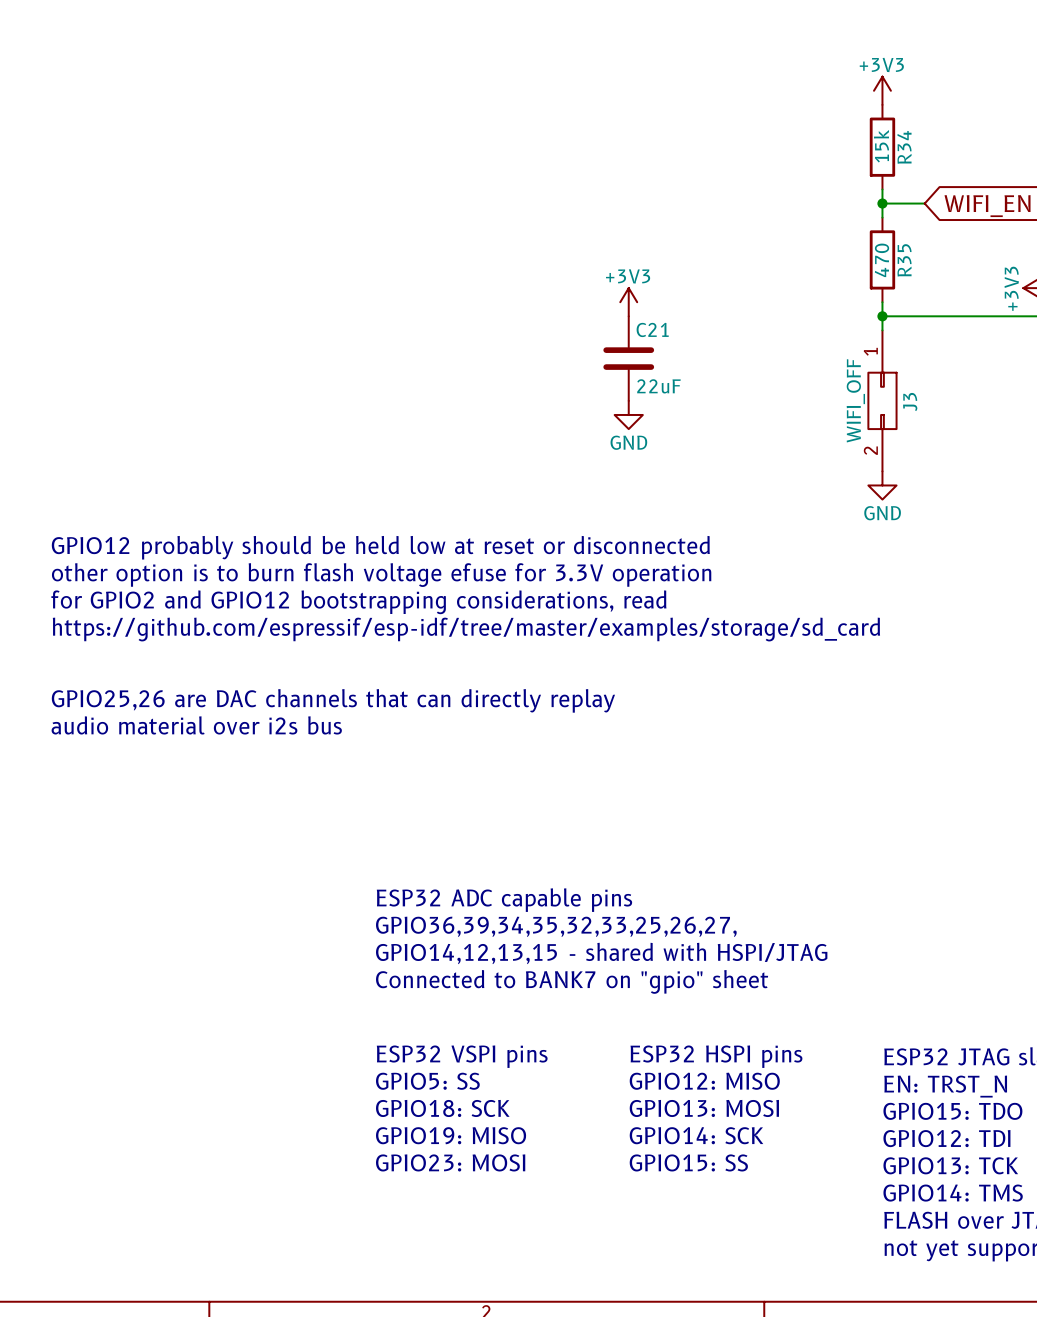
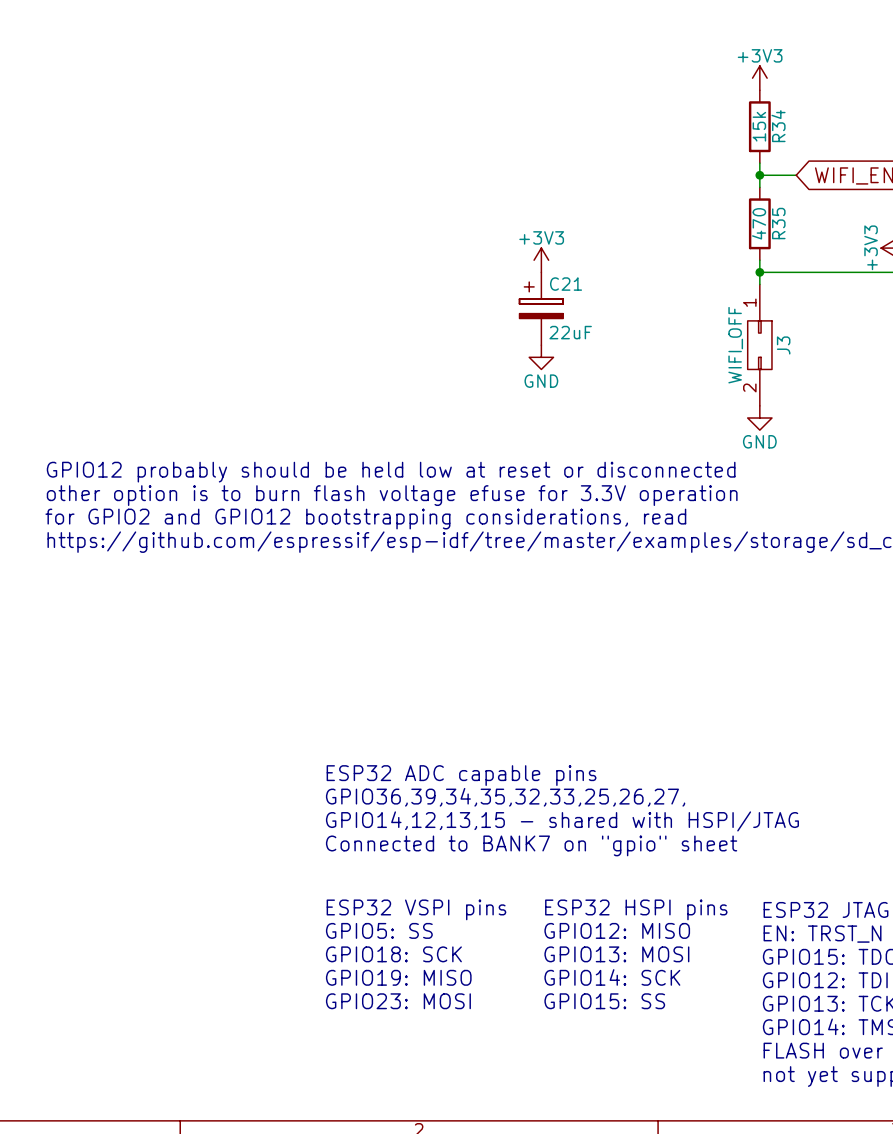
C21 symbol: [603, 316, 655, 401] -> [519, 272, 564, 346]
text: GPIO25,26 are DAC channels that can directly replay (333, 700) -> none
text: audio material over i2s bus (196, 725) -> none

